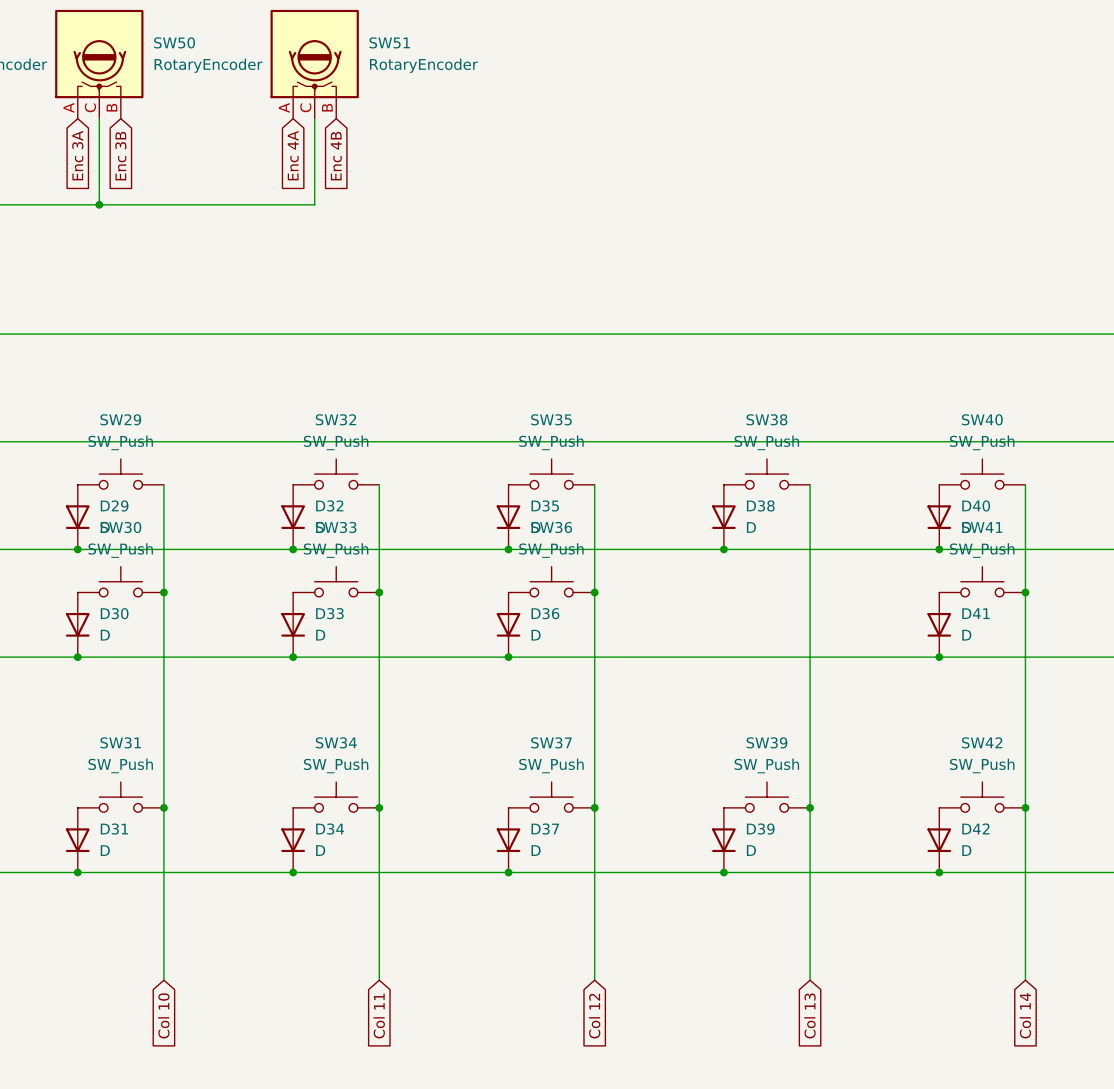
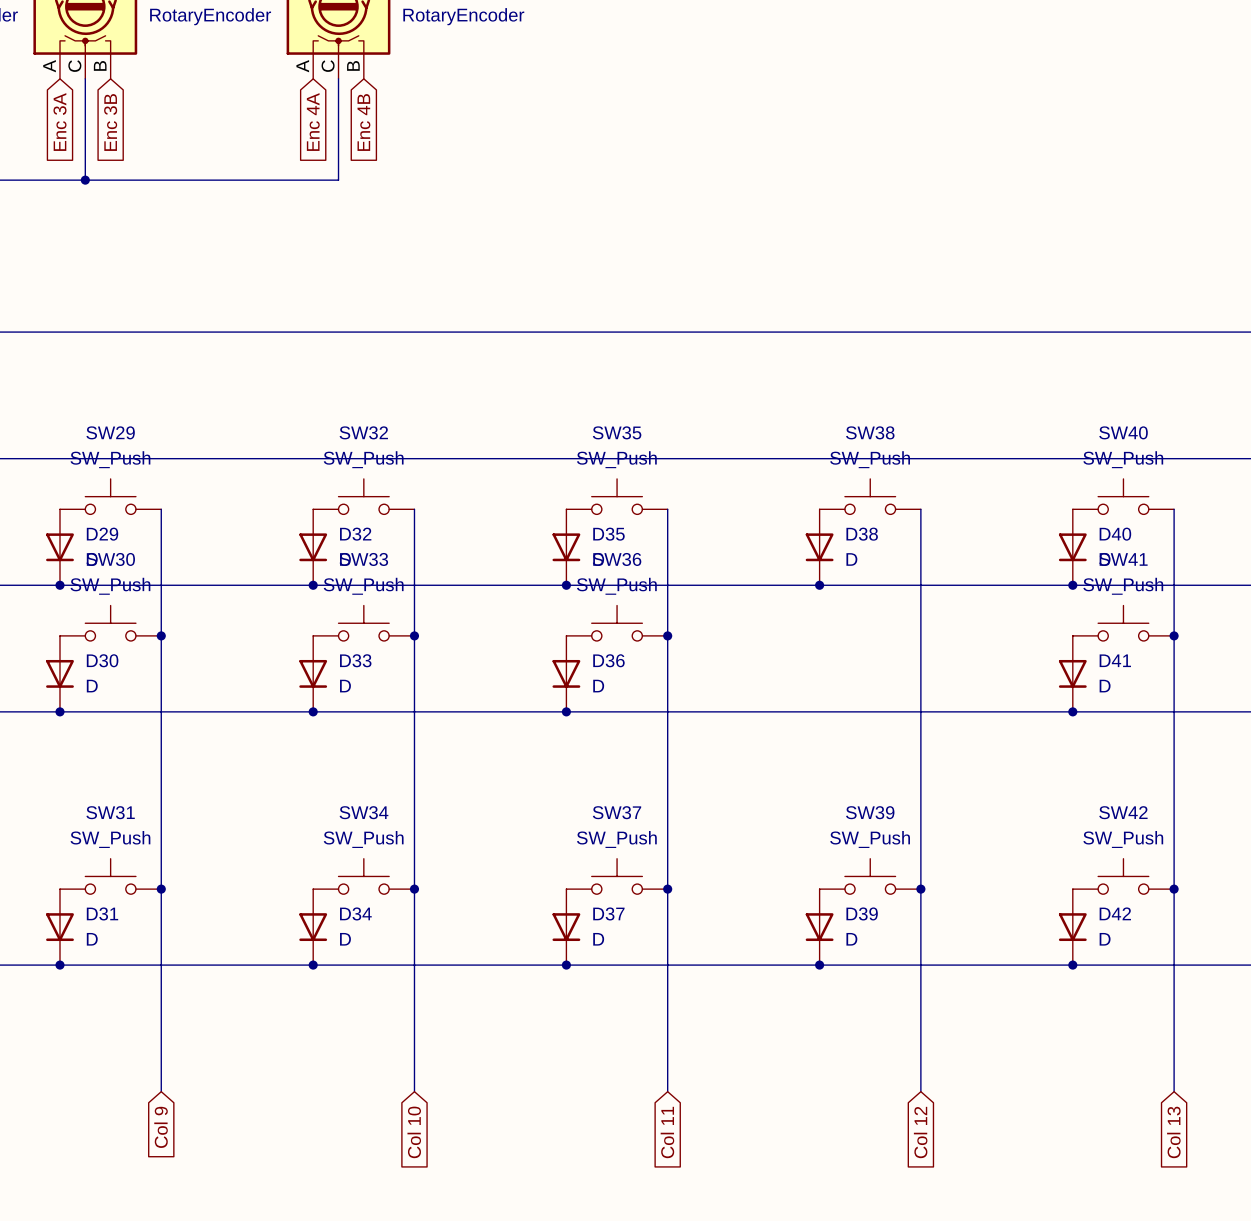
global label: Col 10 (163, 1015) -> Col 9 (161, 1127)
global label: Col 13 (809, 1015) -> Col 12 (920, 1132)
global label: Col 14 (1025, 1015) -> Col 13 (1173, 1132)
global label: Col 11 (379, 1016) -> Col 10 (414, 1132)
global label: Col 12 (594, 1016) -> Col 11 (667, 1132)

